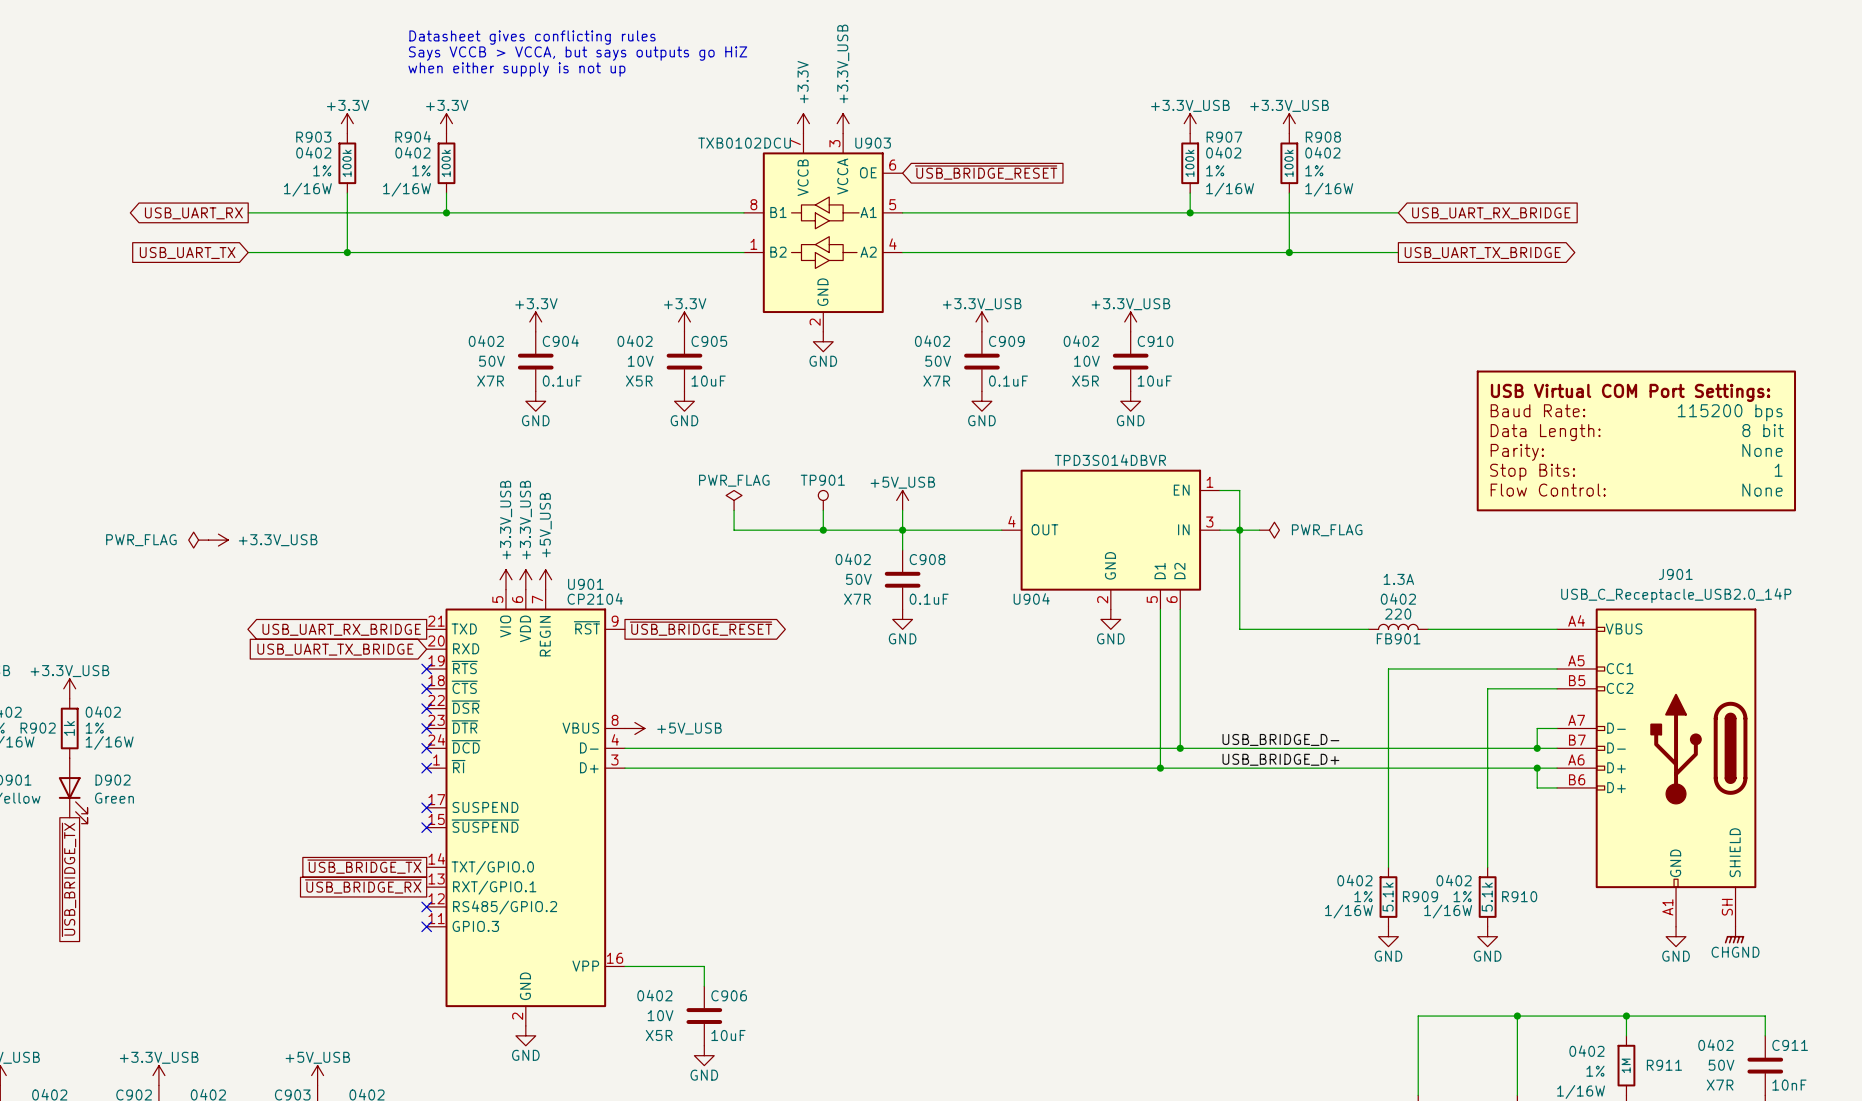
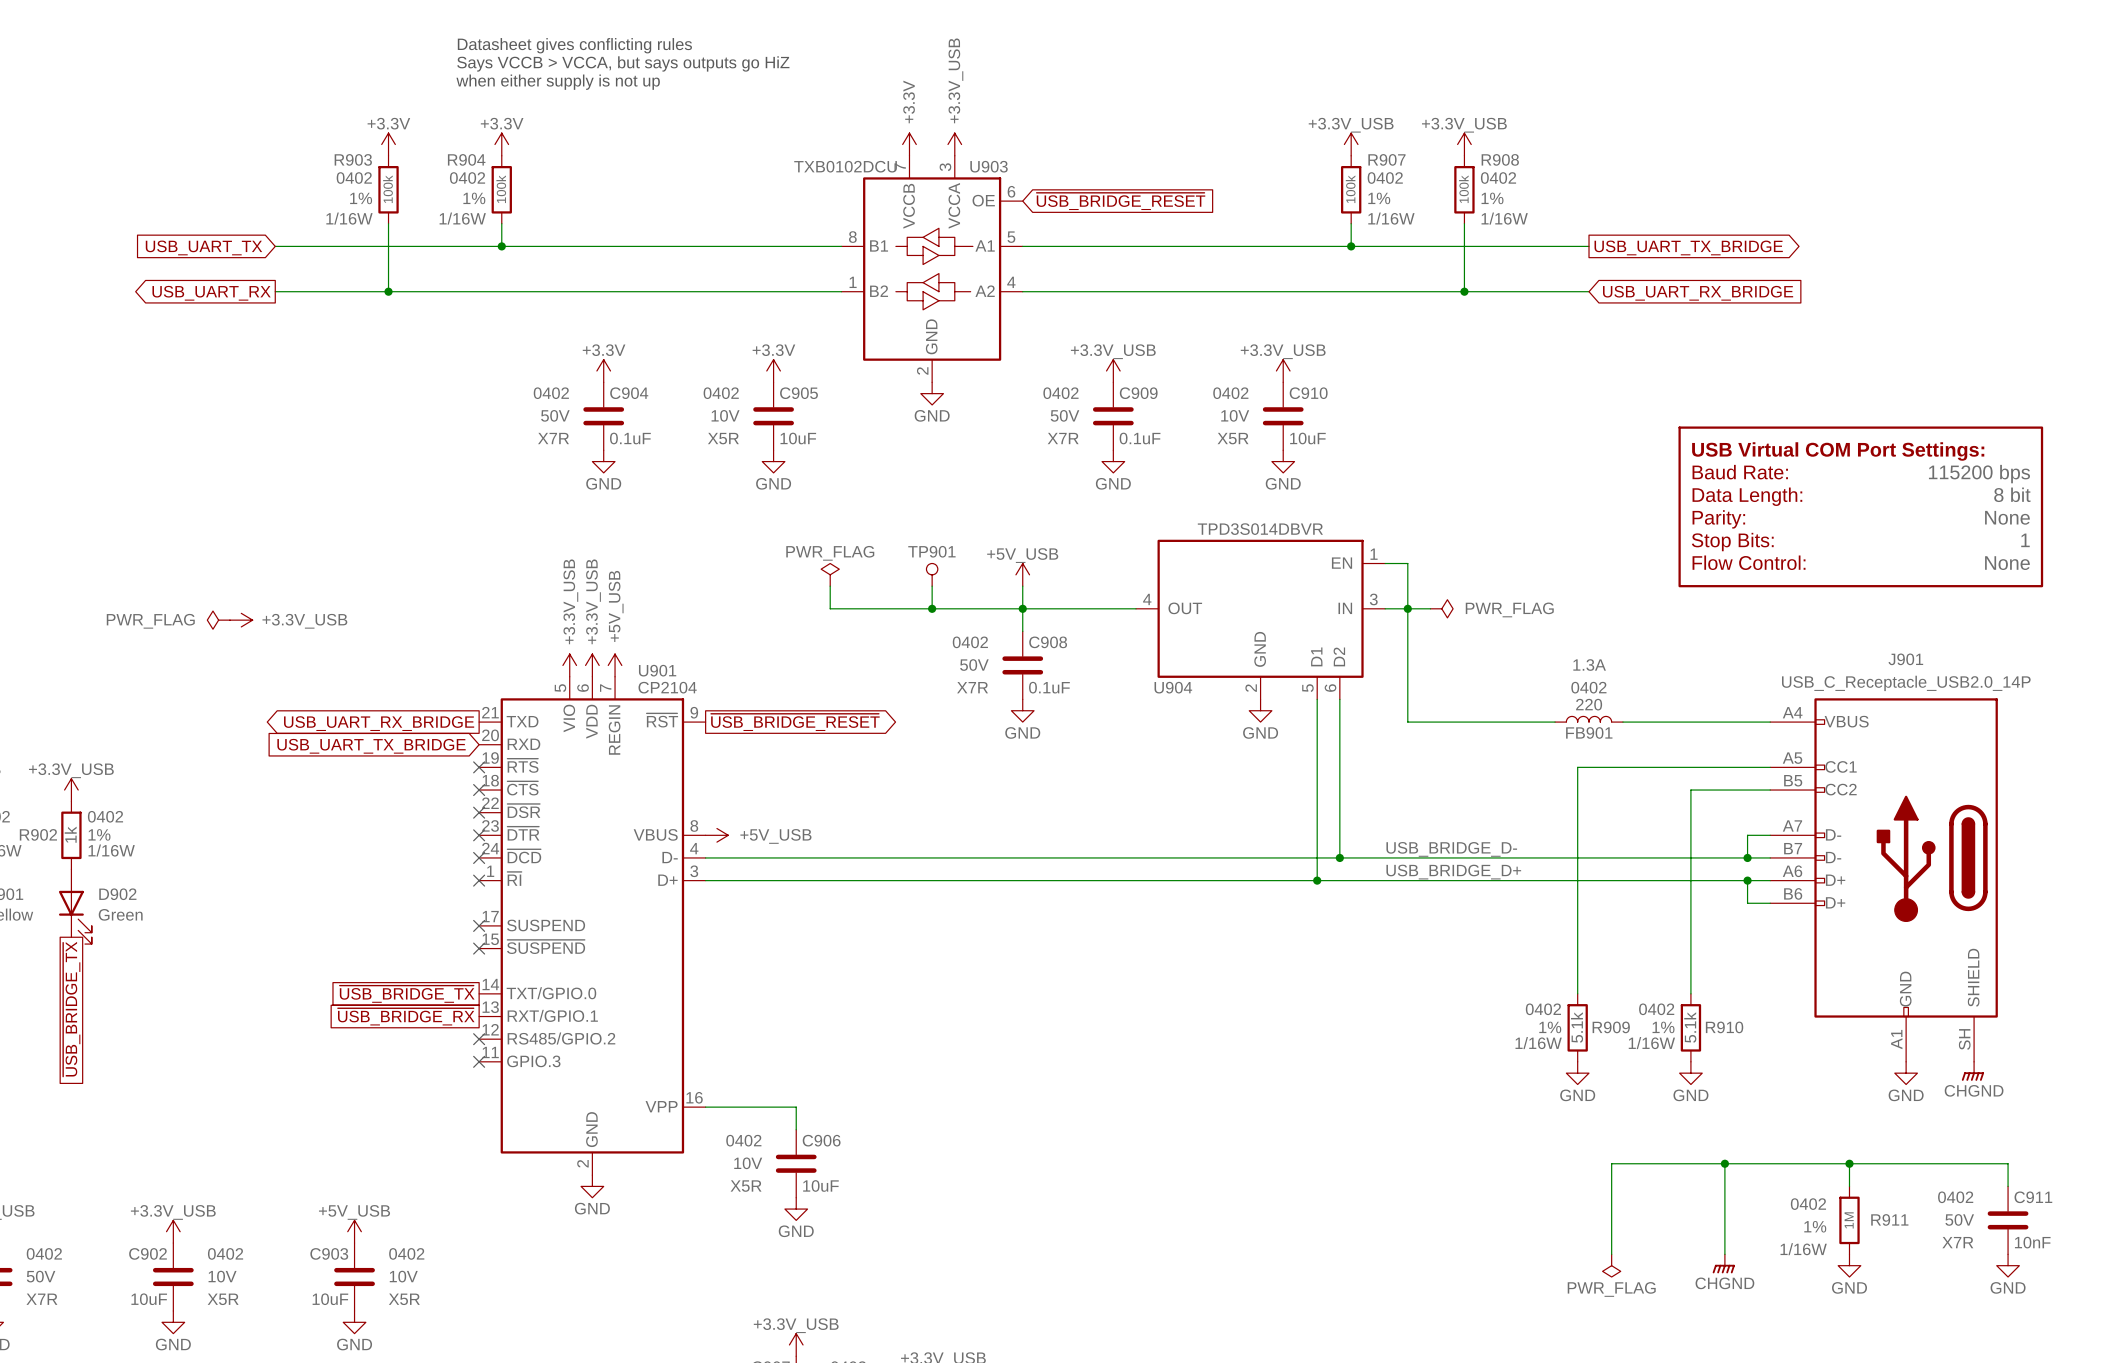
global label shape: output (193, 213) -> input (203, 247)
global label: USB_UART_RX (193, 213) -> USB_UART_TX (203, 247)
global label shape: input (1491, 213) -> output (1688, 247)
global label: USB_UART_RX_BRIDGE (1491, 213) -> USB_UART_TX_BRIDGE (1688, 247)
global label shape: input (187, 253) -> output (211, 293)
global label: USB_UART_TX (187, 253) -> USB_UART_RX (211, 293)
global label shape: output (1482, 253) -> input (1698, 293)
global label: USB_UART_TX_BRIDGE (1482, 253) -> USB_UART_RX_BRIDGE (1698, 293)

